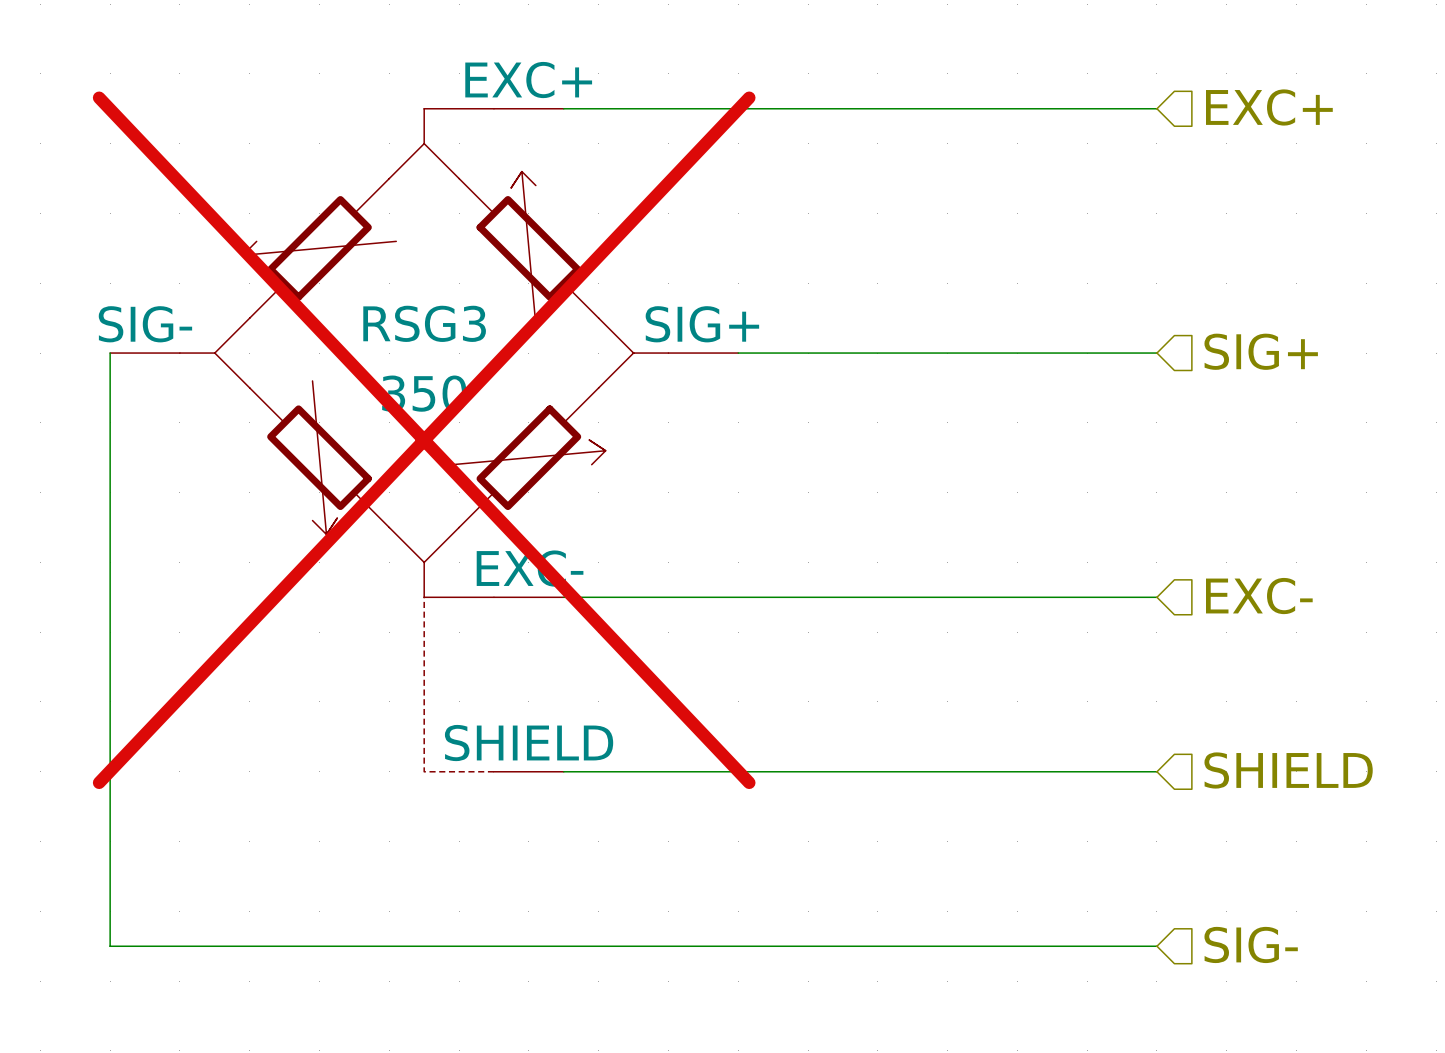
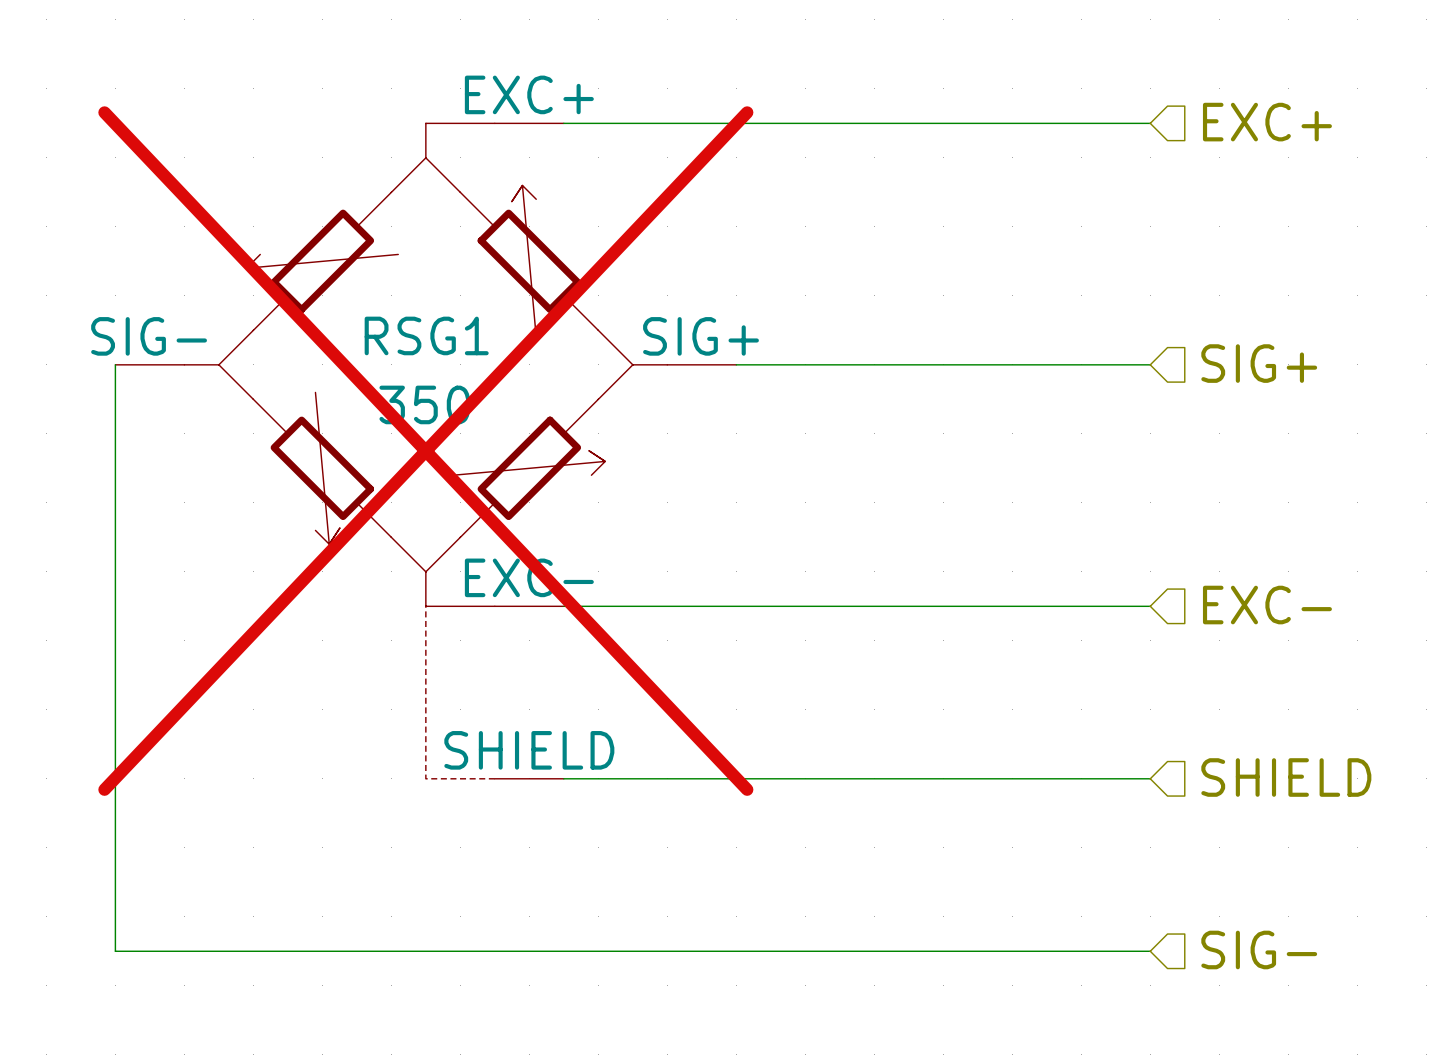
RSG3 name: RSG3 (424, 323) -> RSG1 (426, 335)

